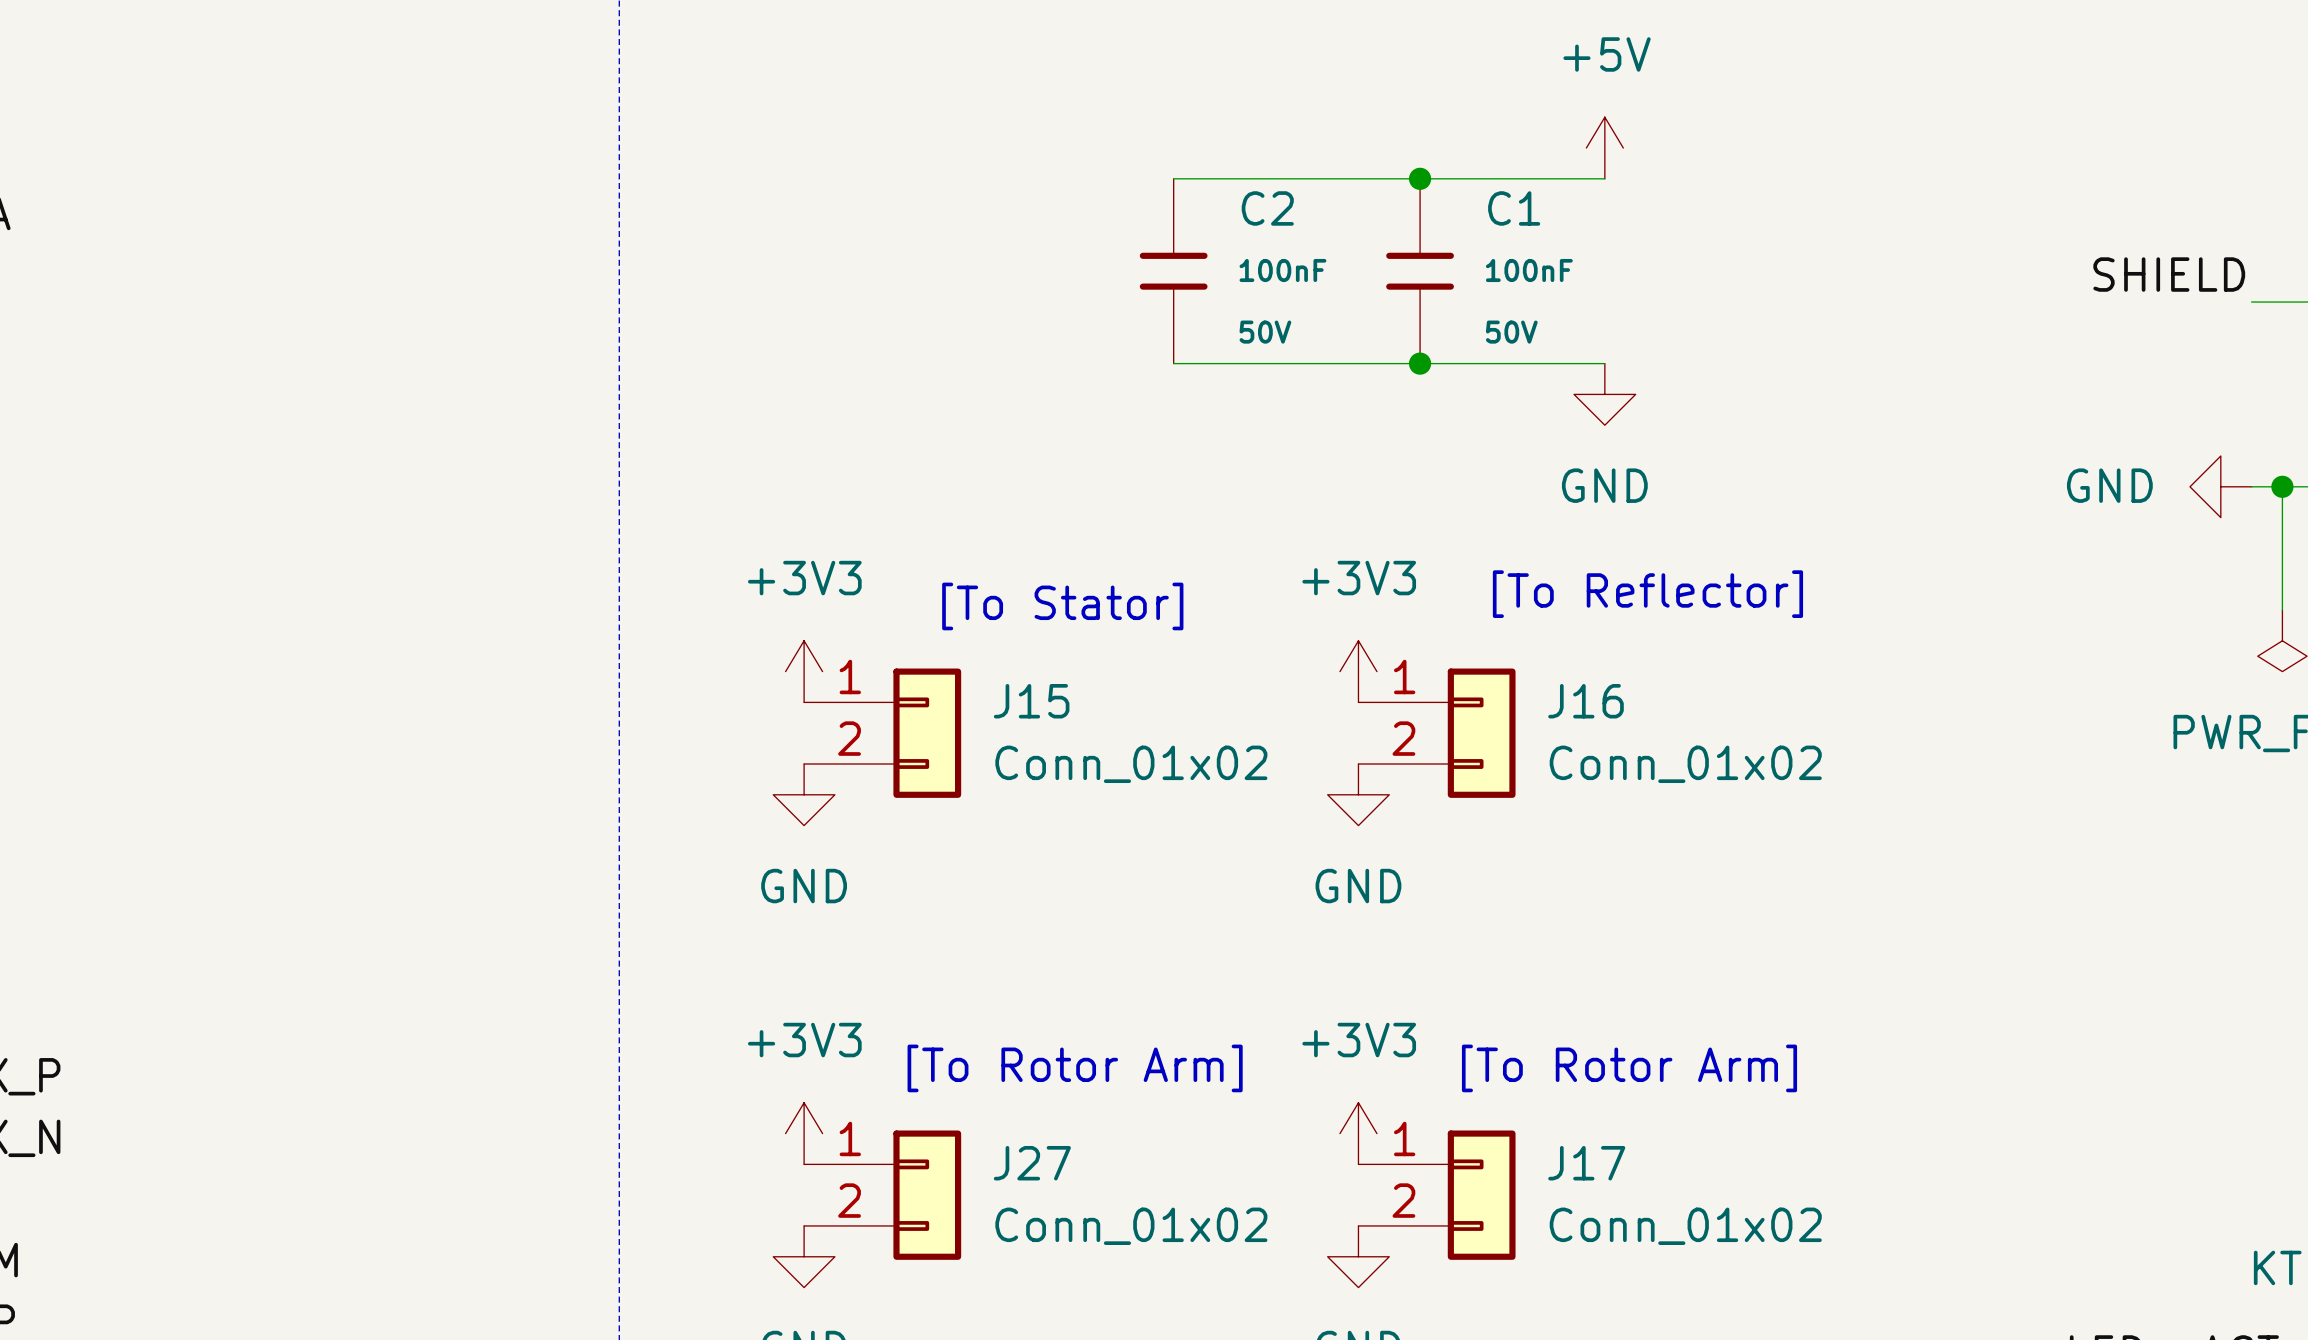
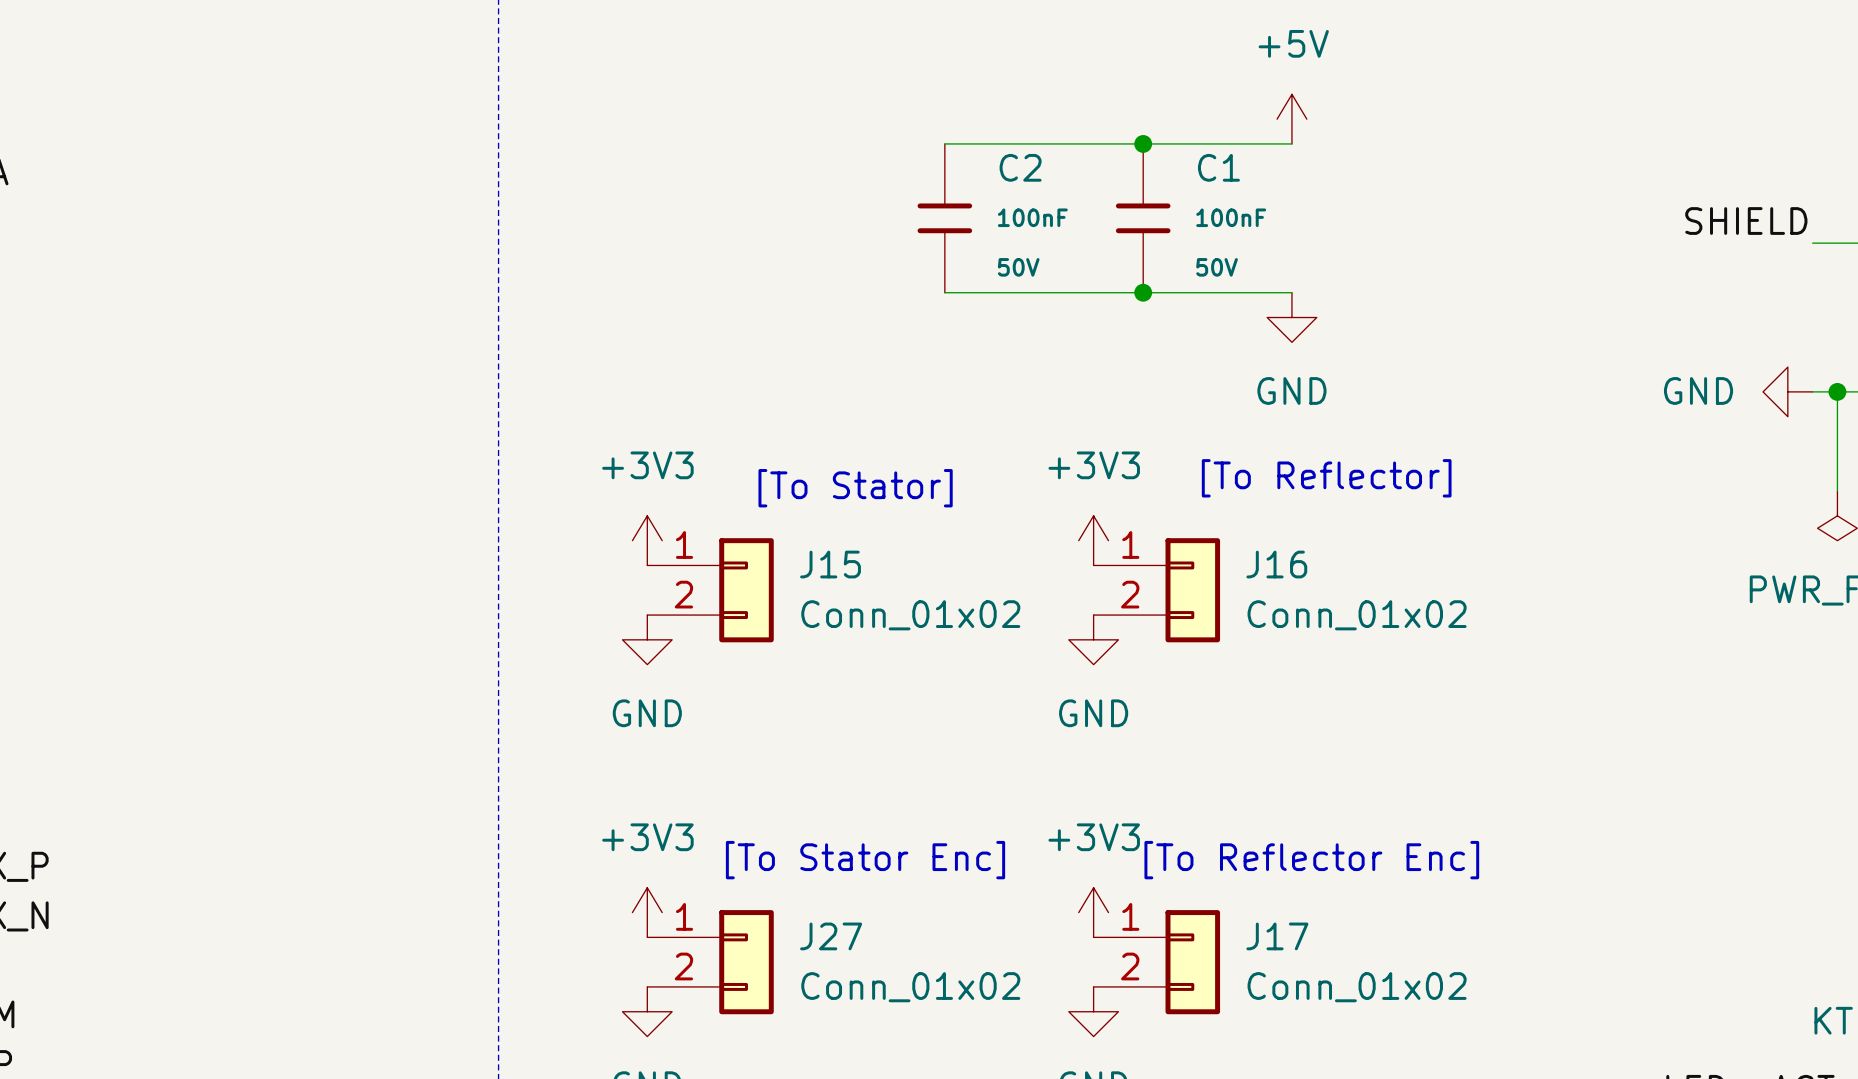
text: [To Rotor Arm] (1075, 1068) -> [To Stator Enc] (865, 860)
text: [To Rotor Arm] (1629, 1068) -> [To Reflector Enc] (1311, 860)

